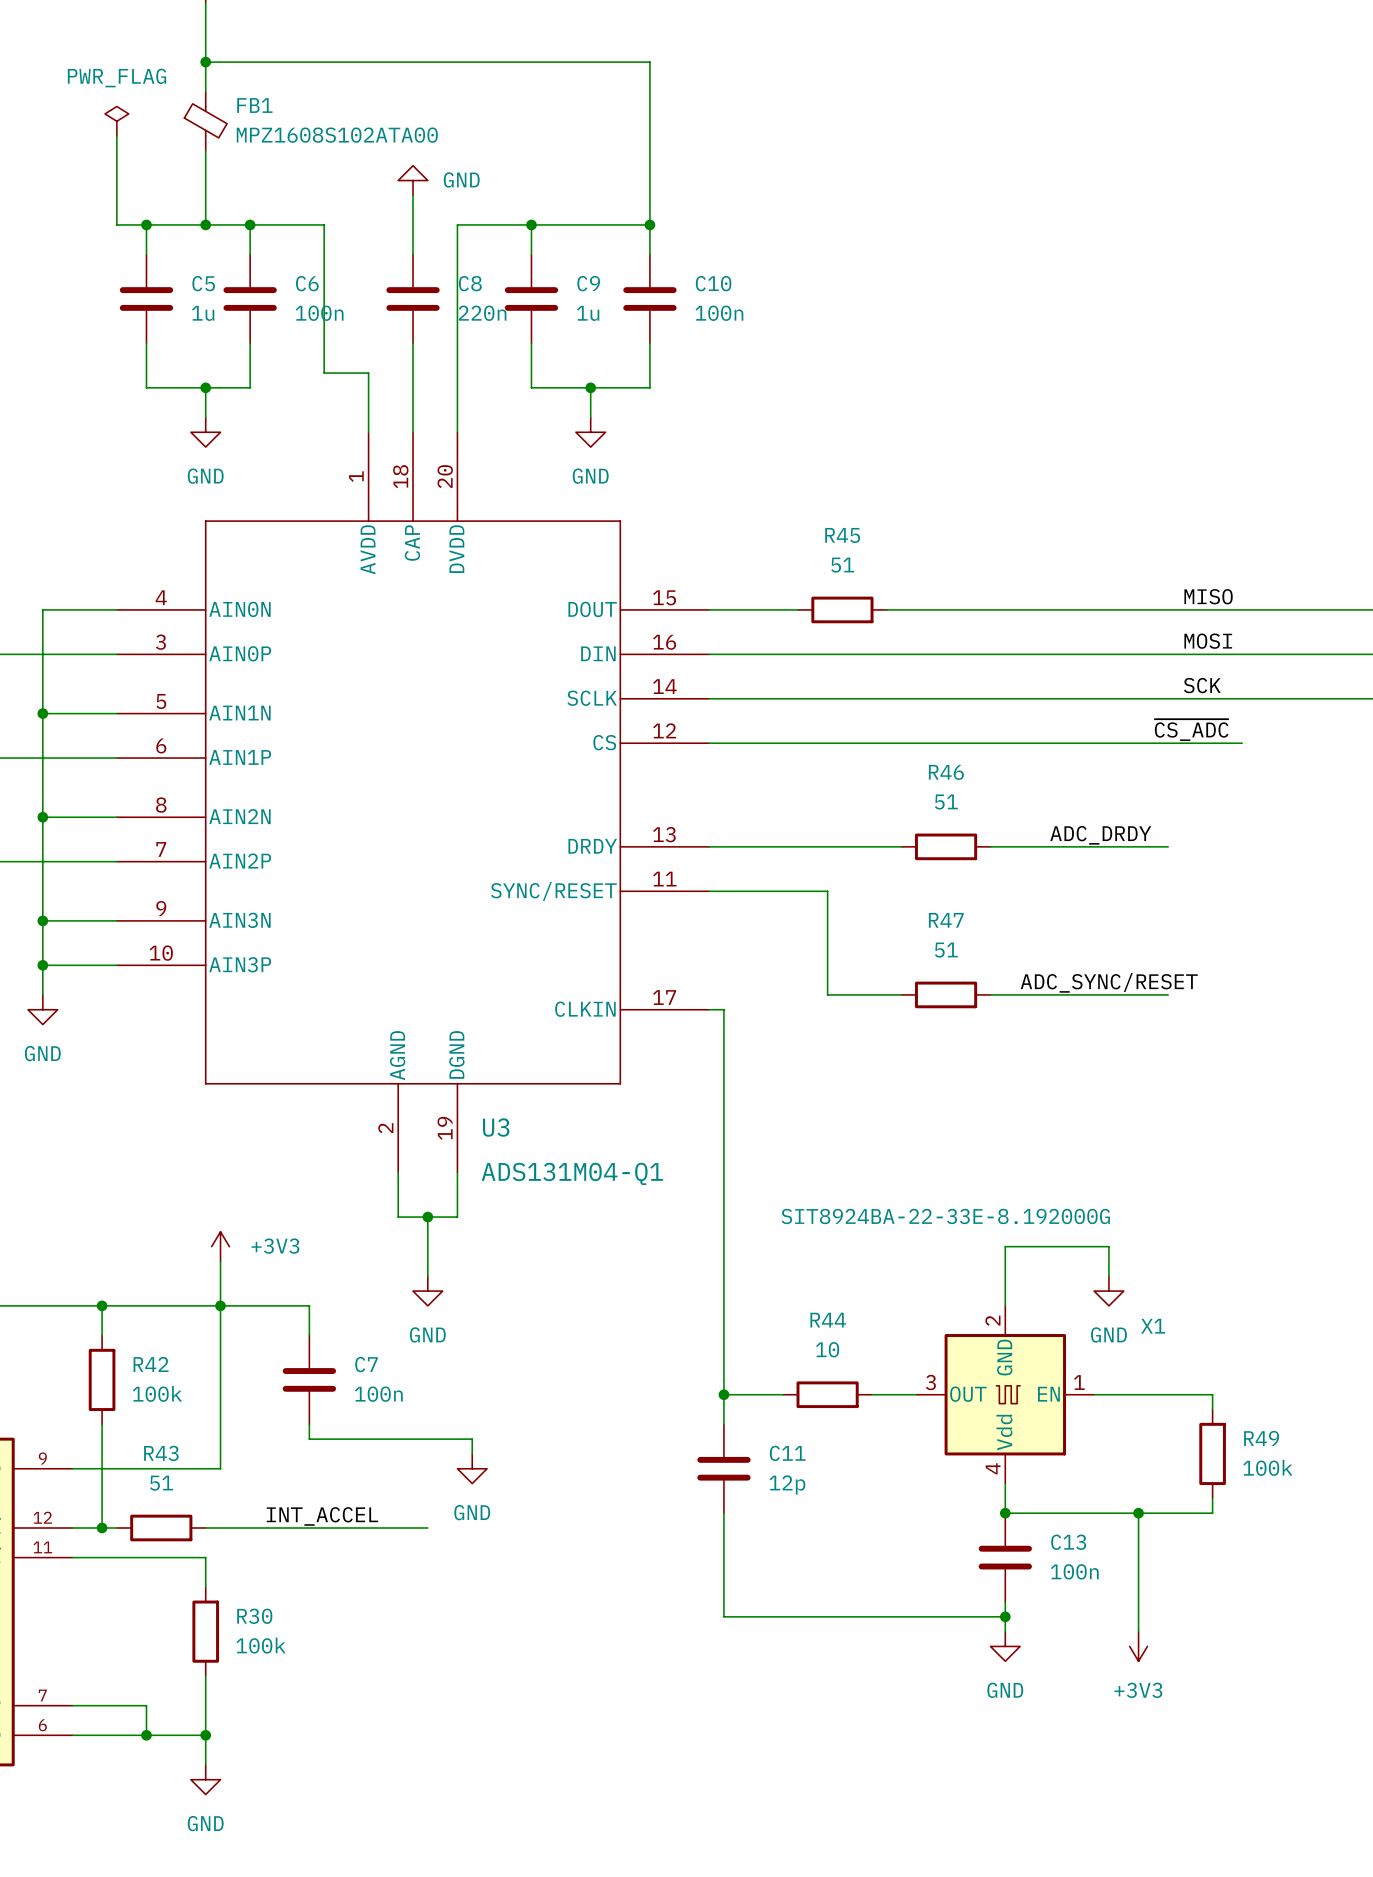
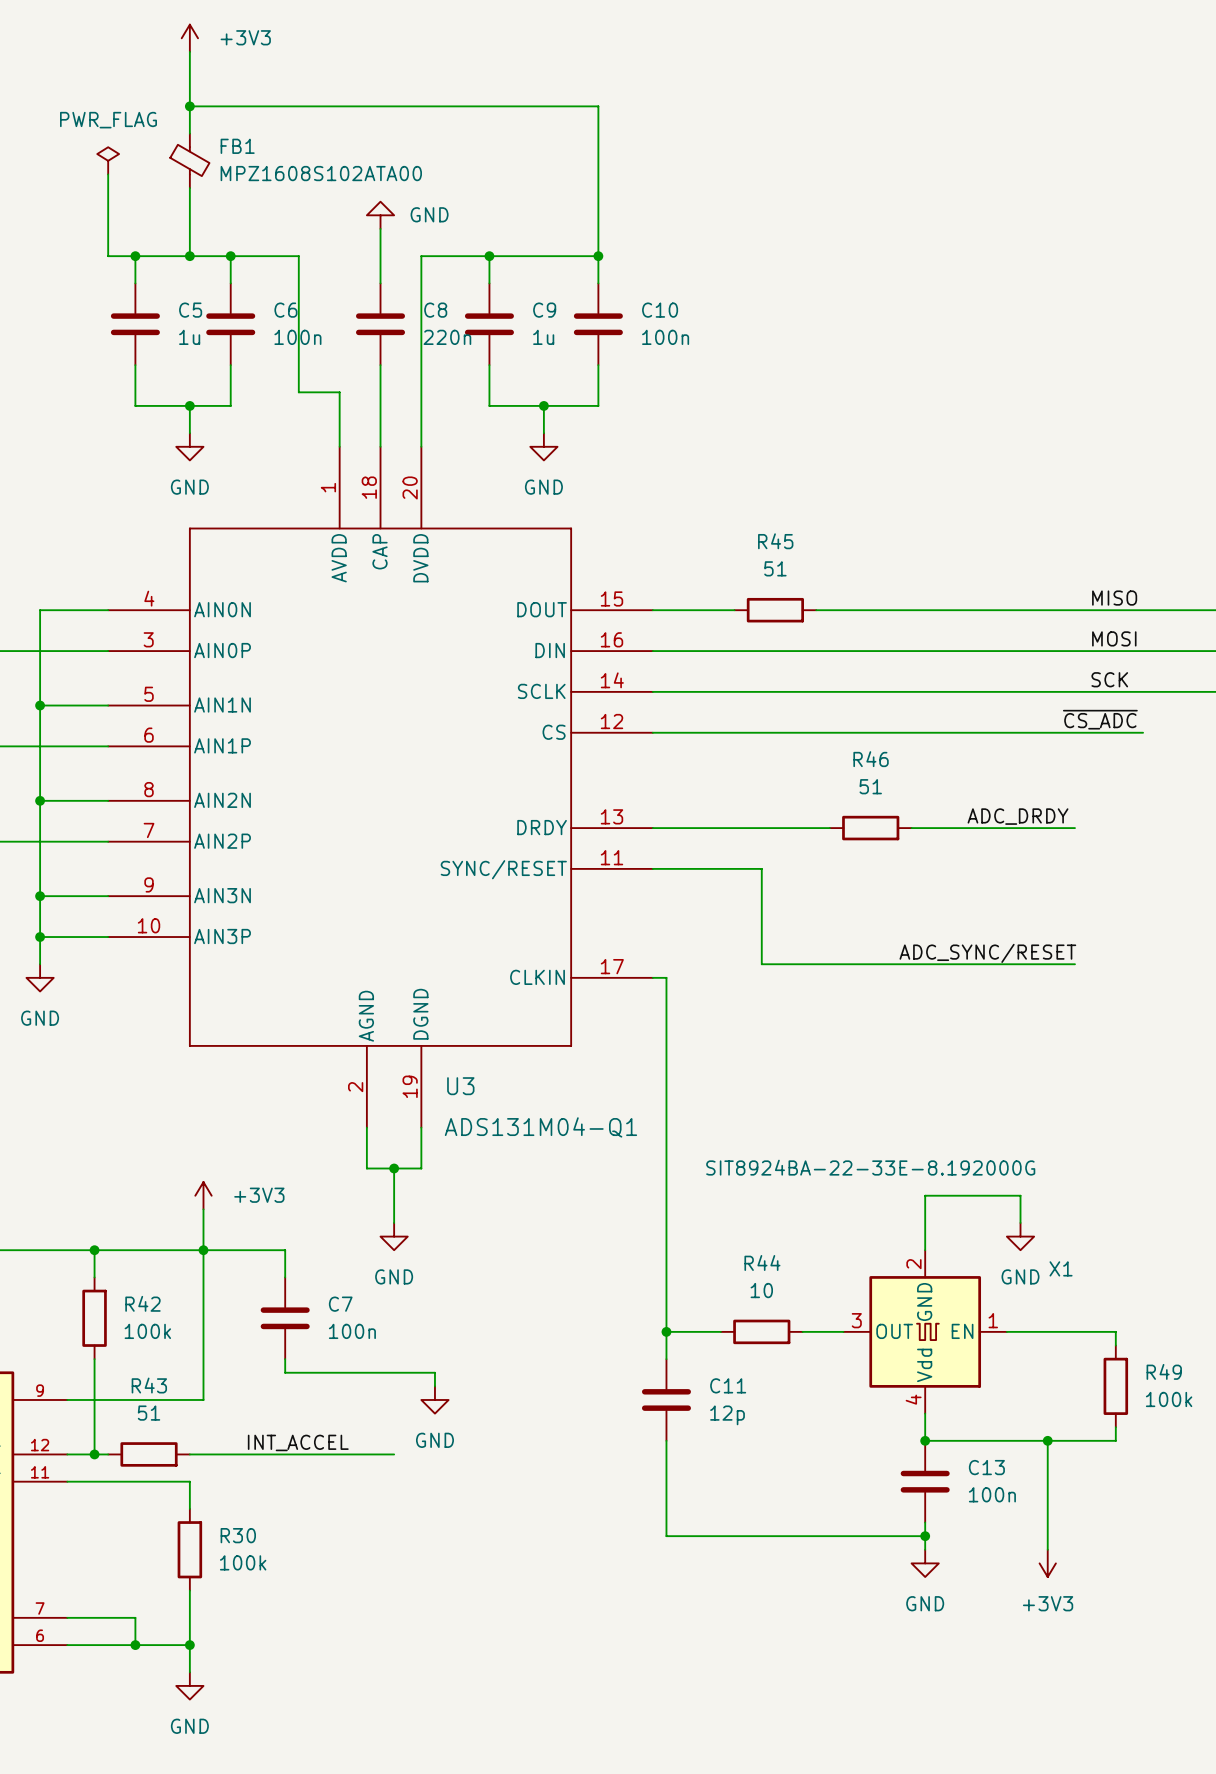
label position: ADC_SYNC/RESET (1109, 982) -> ADC_SYNC/RESET (987, 953)
wire: none -> (829, 964) (911, 964)
R47: 51 (946, 994) -> none

